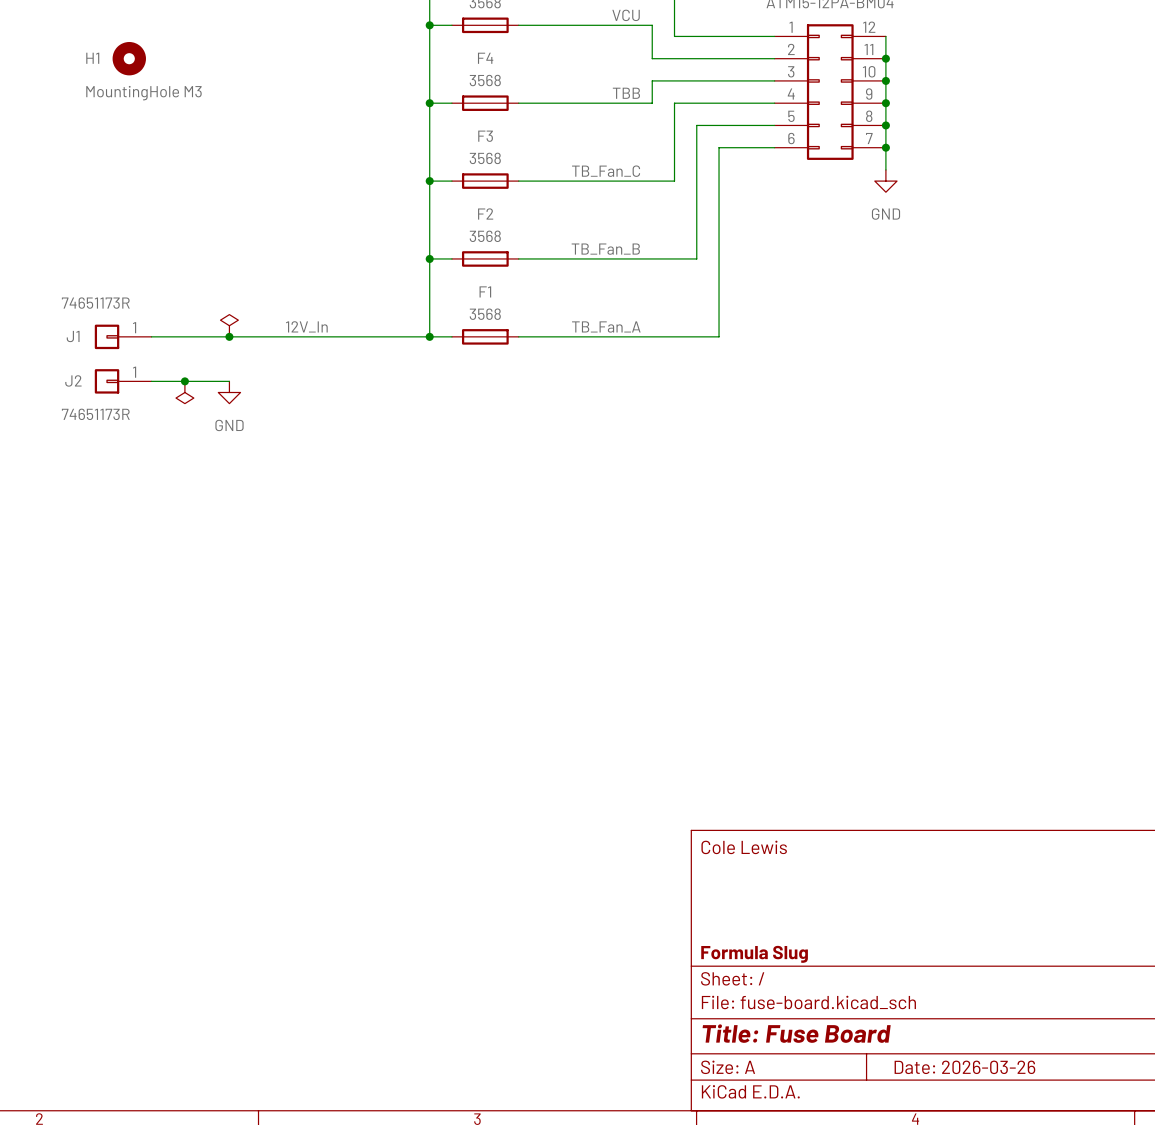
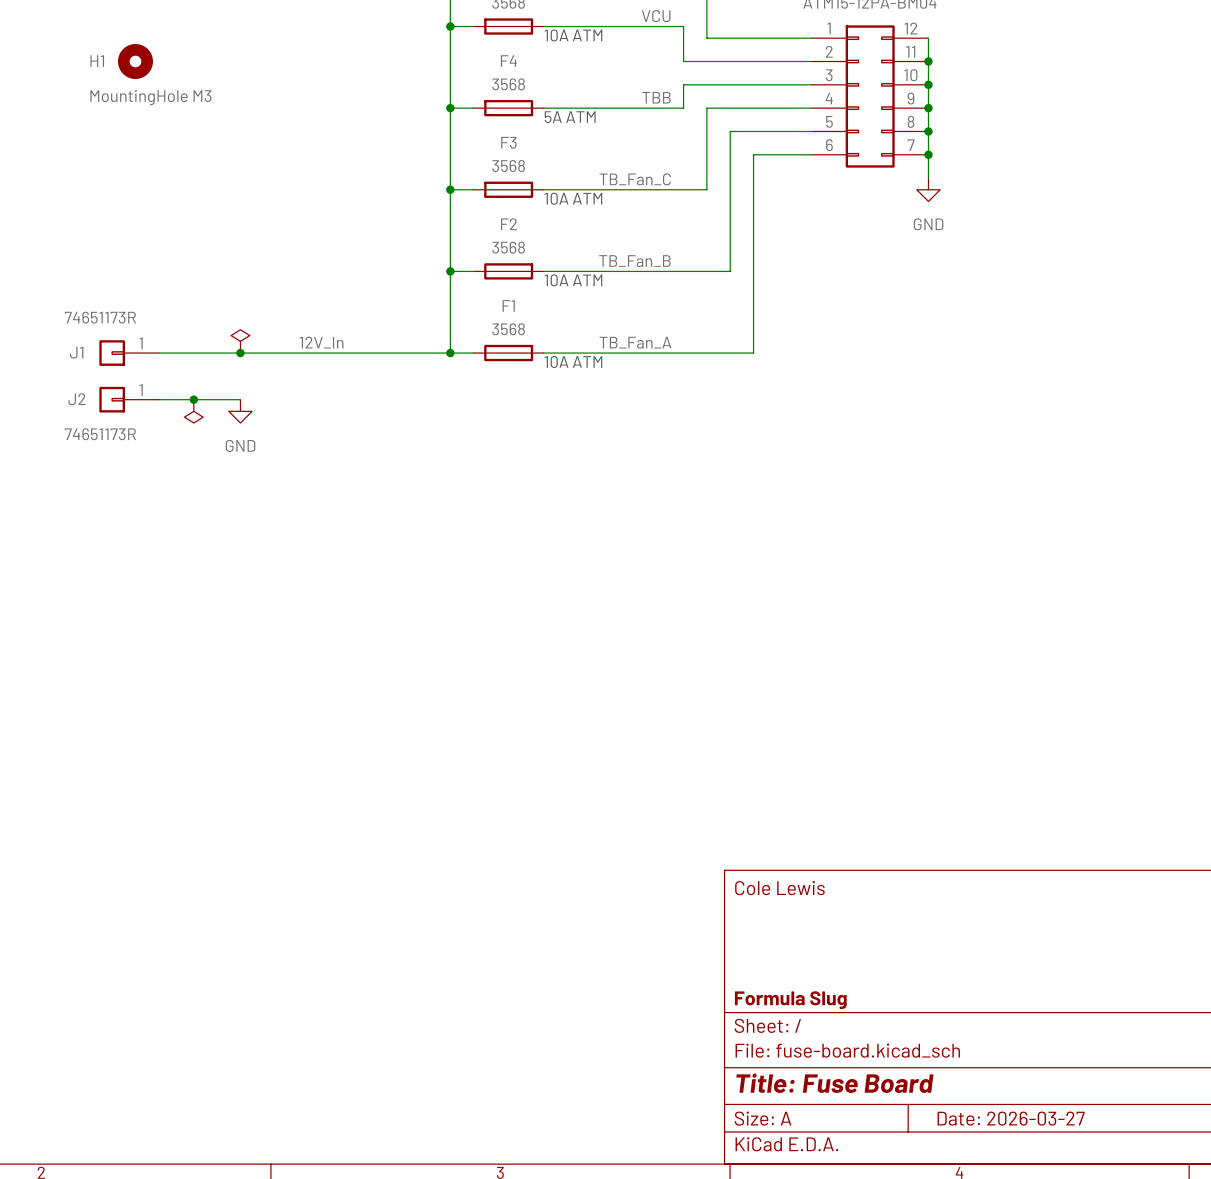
text: none -> 10A ATM (573, 35)
text: none -> 5A ATM (570, 117)
text: none -> 10A ATM (573, 198)
text: none -> 10A ATM (573, 280)
text: none -> 10A ATM (573, 361)
title block: Date: 2026-03-26 (964, 1067) -> Date: 2026-03-27 (1011, 1118)

